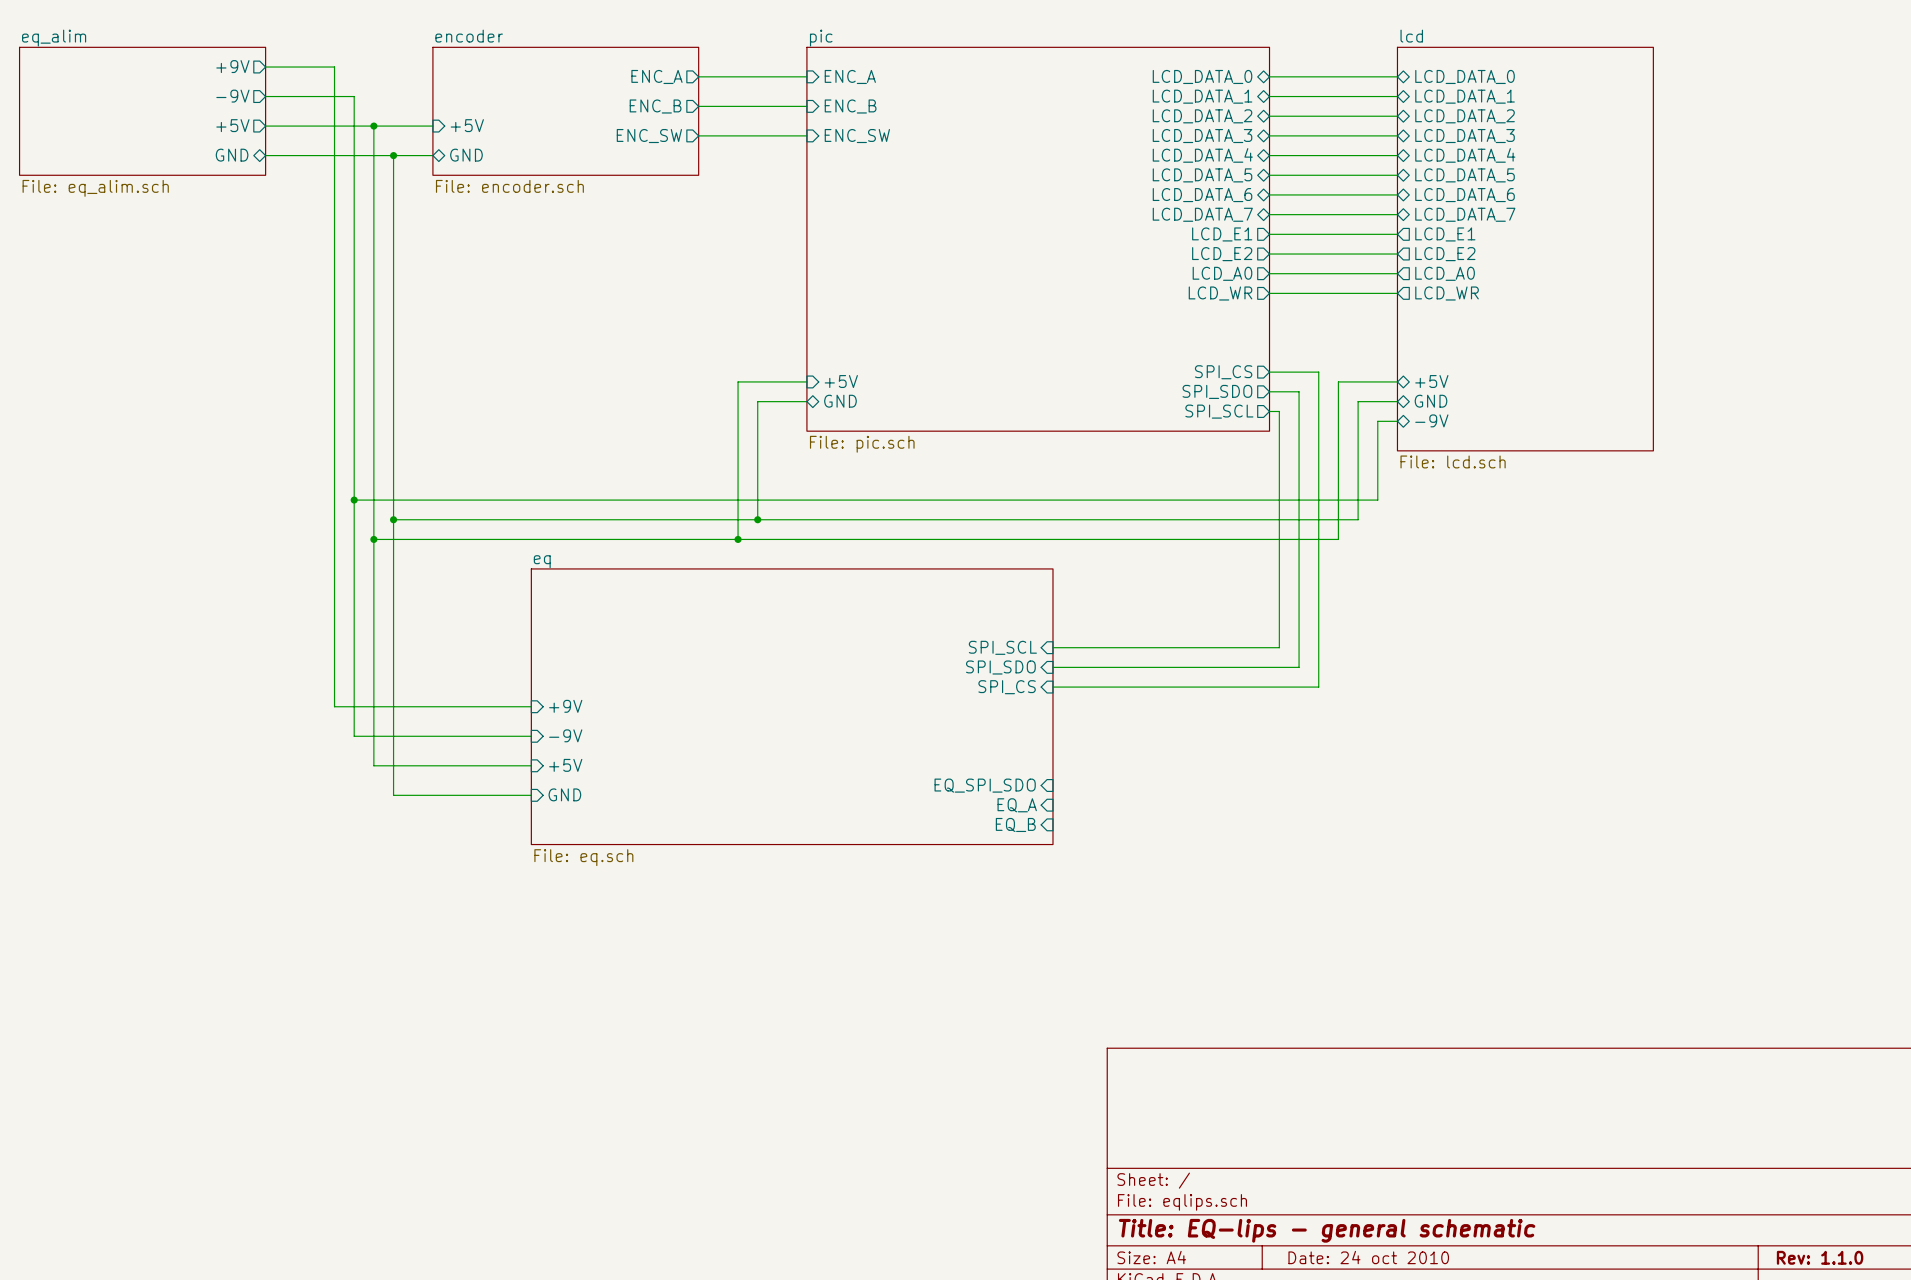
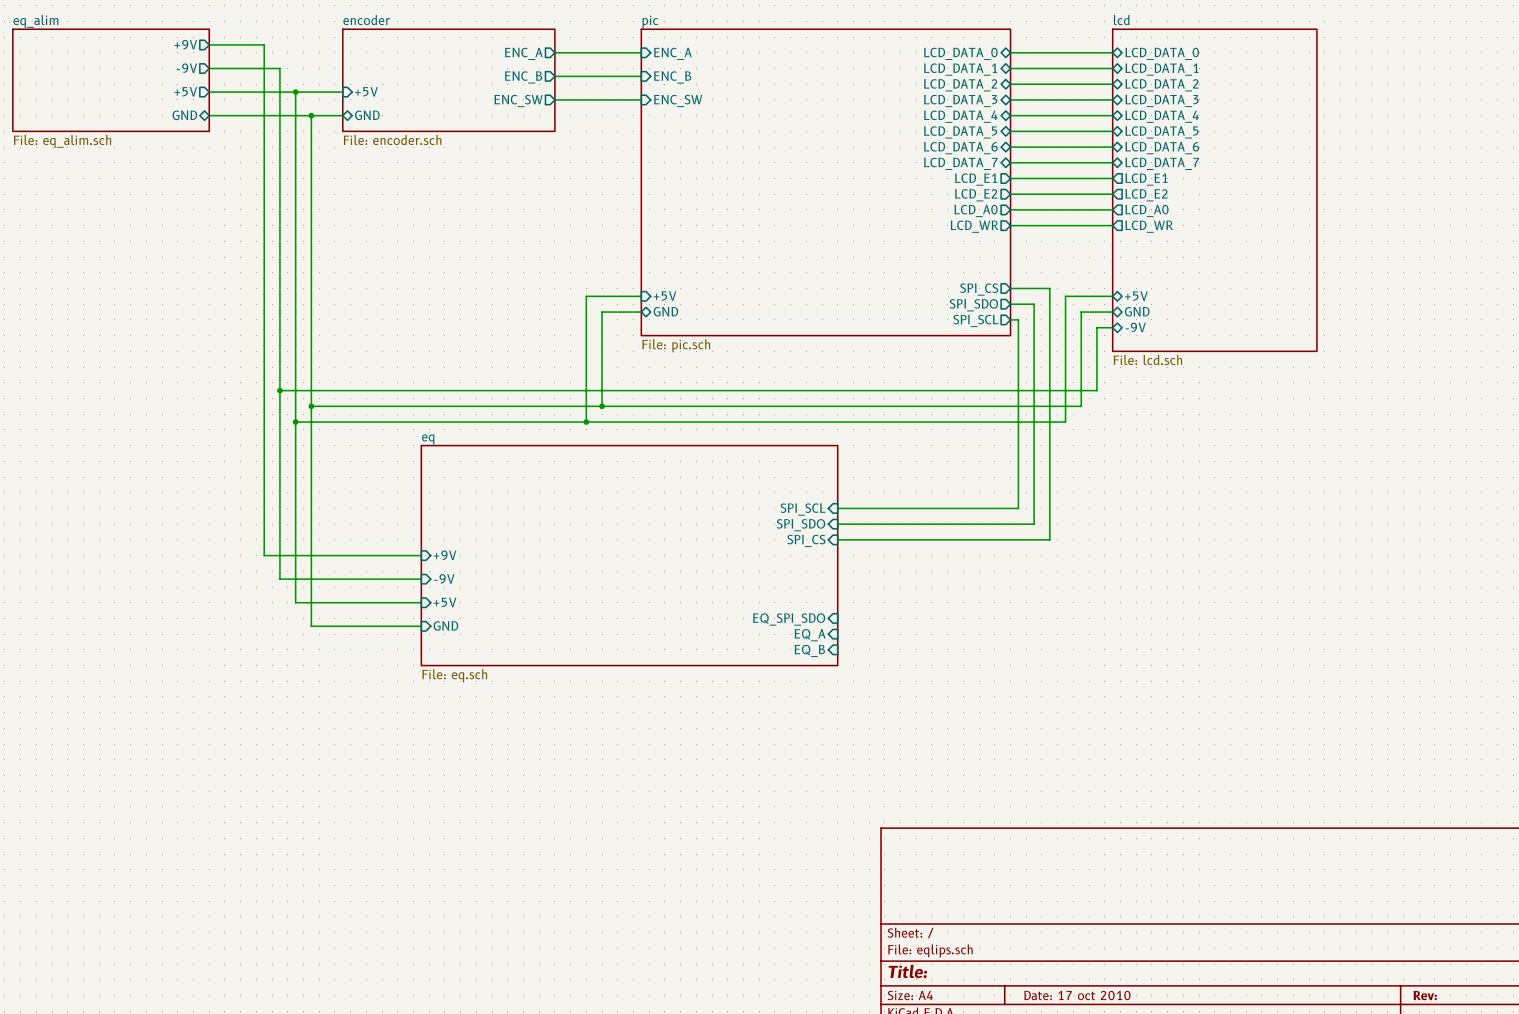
title block: Title: EQ-lips - general schematic (1327, 1230) -> Title: (907, 971)
title block: Date: 24 oct 2010 (1368, 1257) -> Date: 17 oct 2010 (1077, 995)
title block: Rev: 1.1.0 (1820, 1257) -> Rev: (1425, 995)

